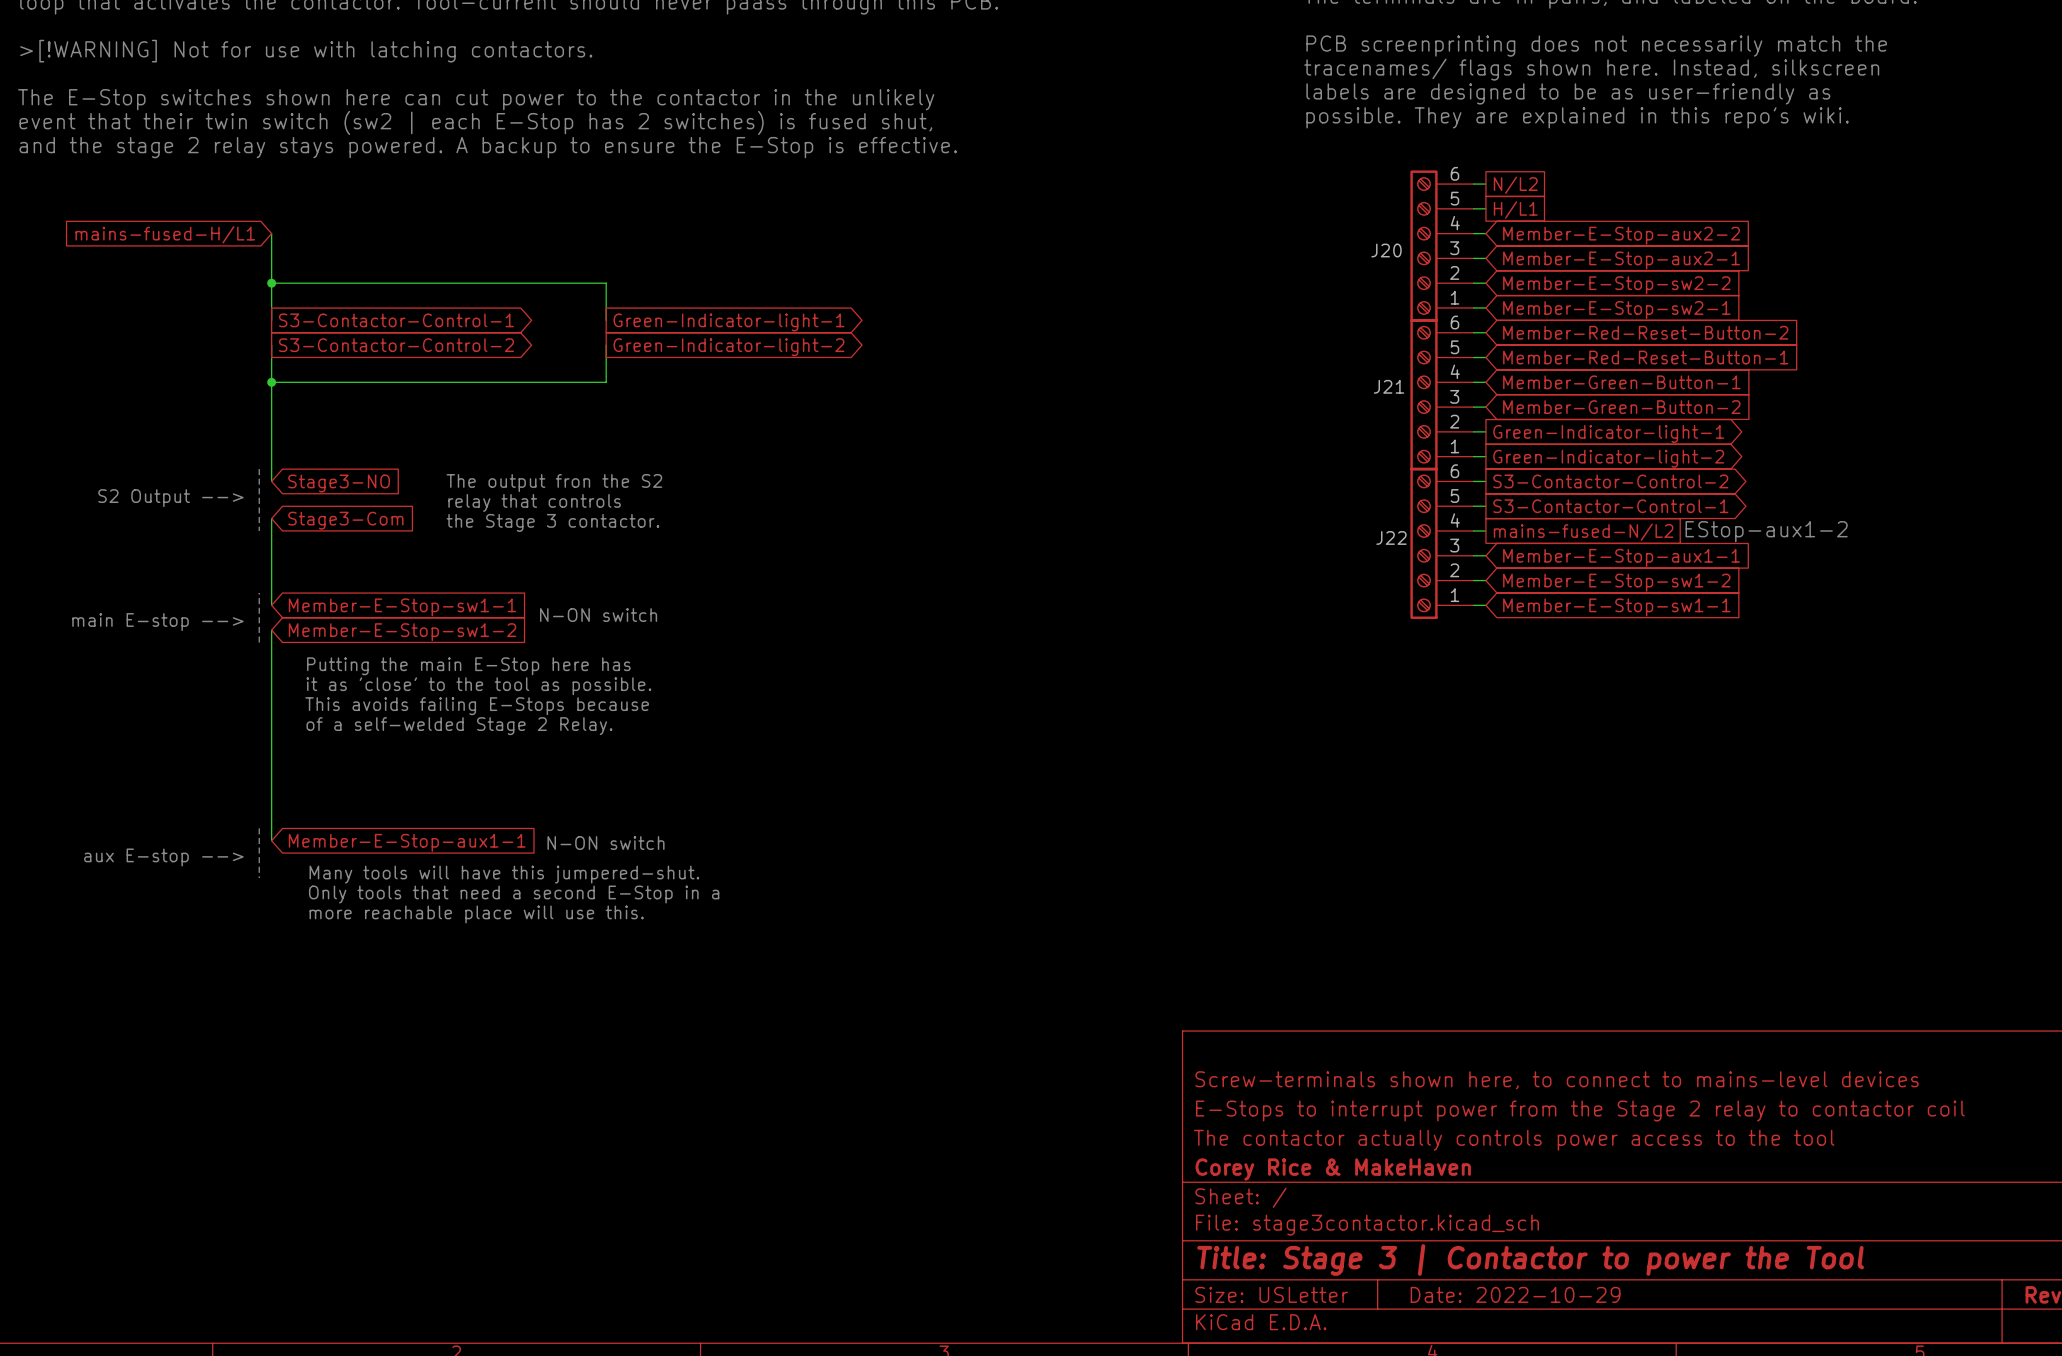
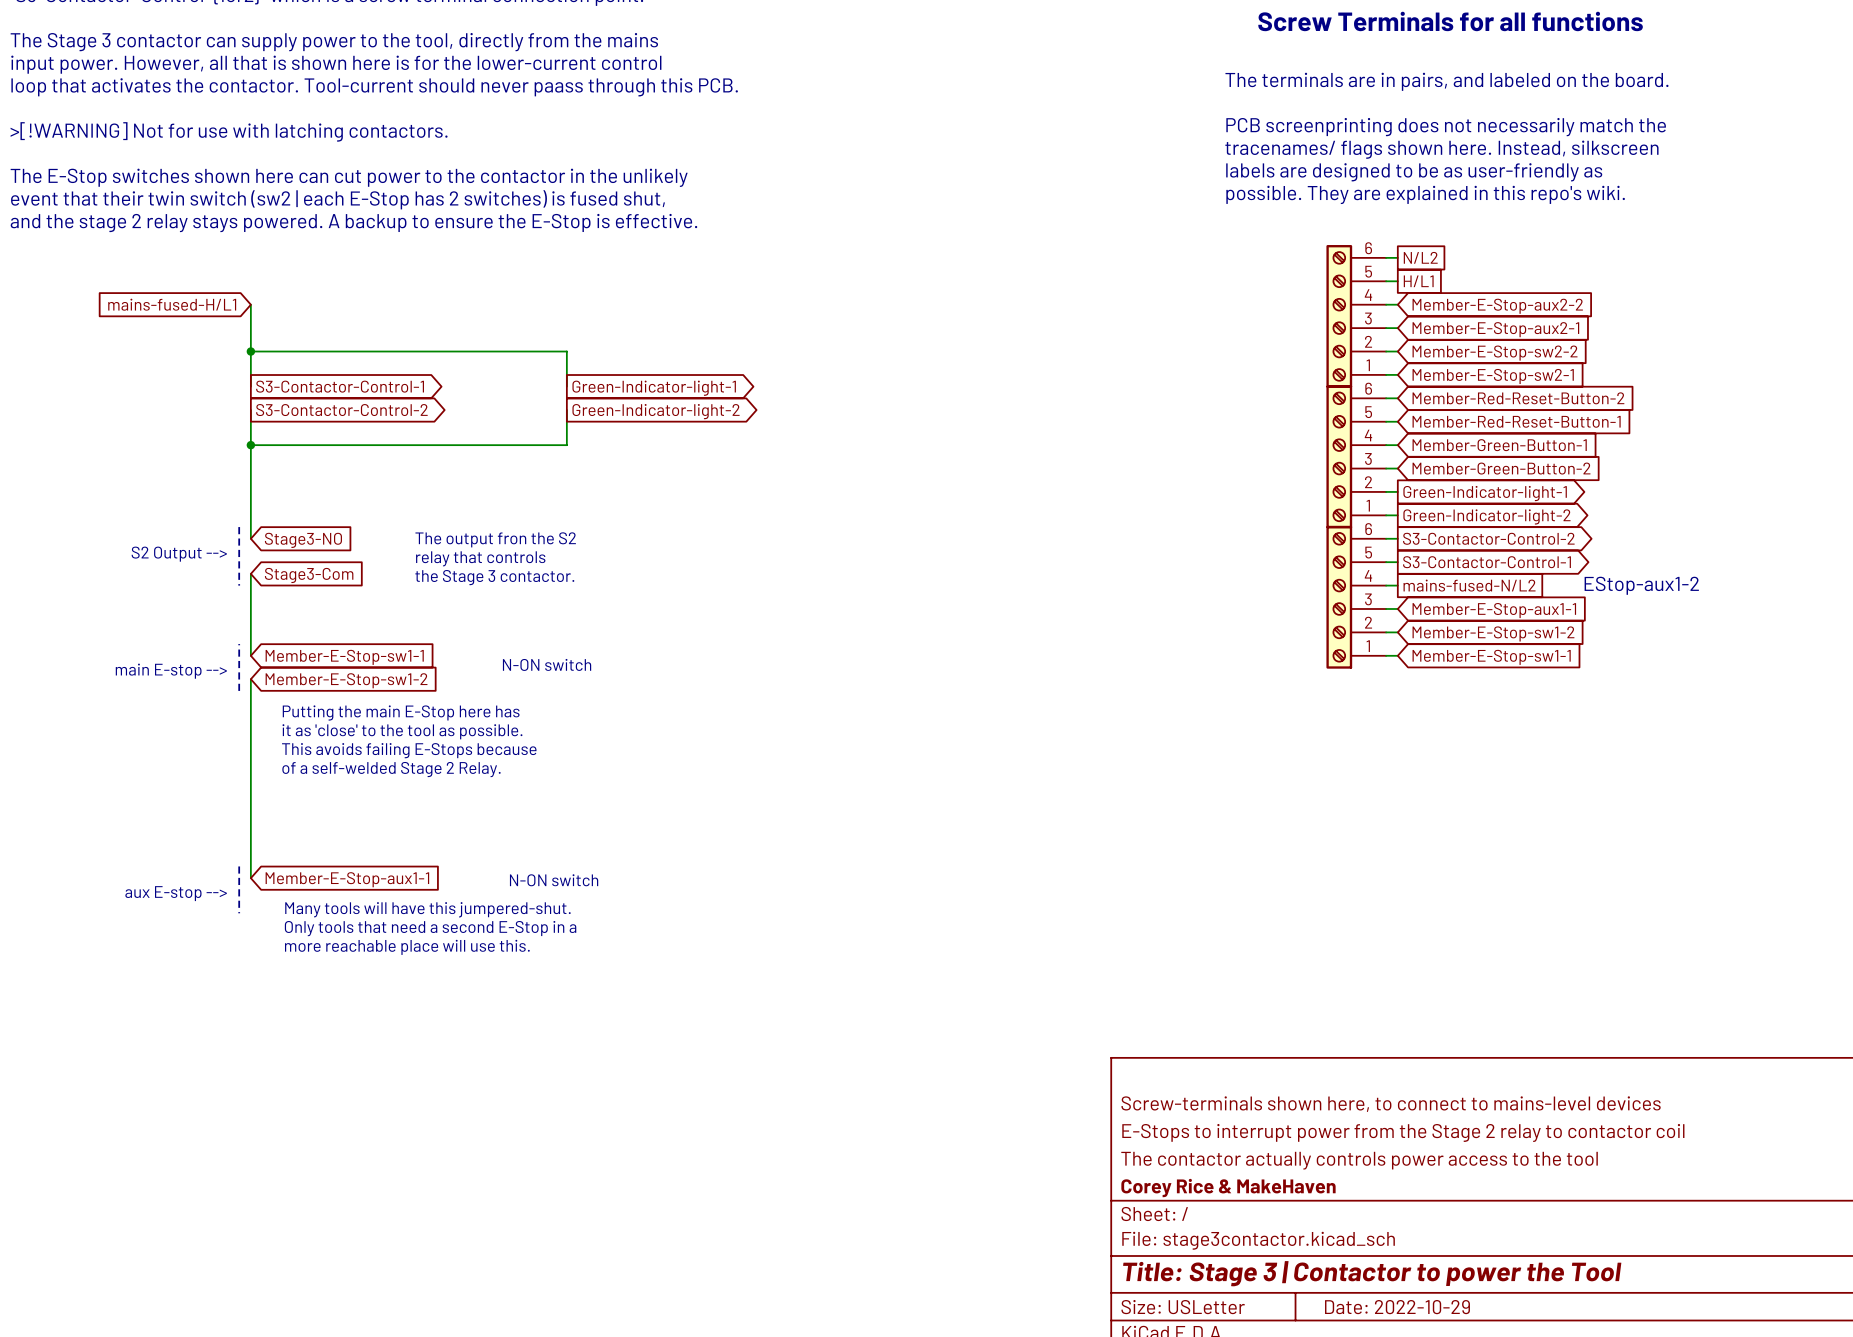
J20 name: J20 (1386, 250) -> none
J21 name: J21 (1389, 386) -> none
J22 name: J22 (1391, 537) -> none

